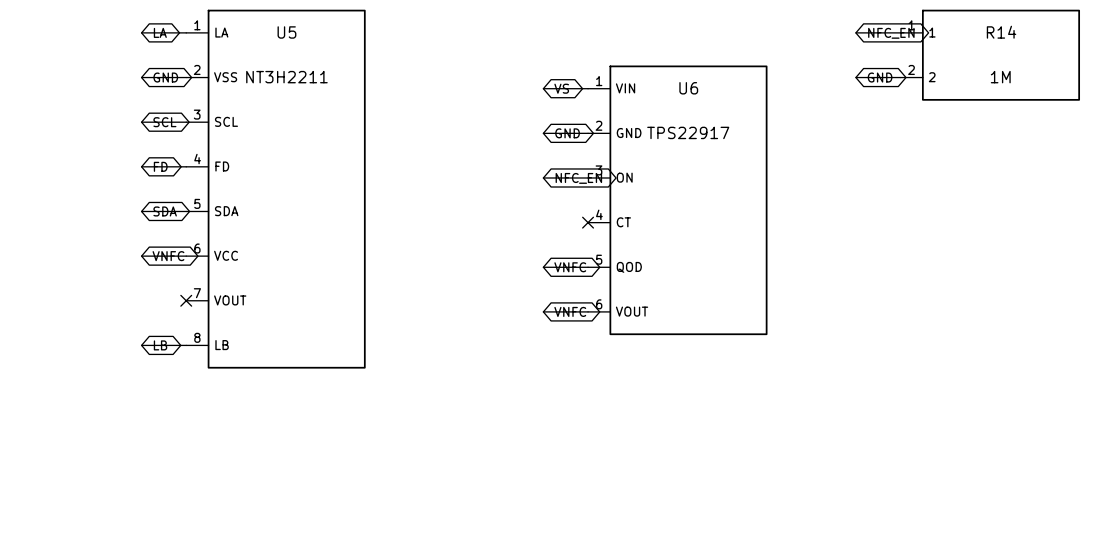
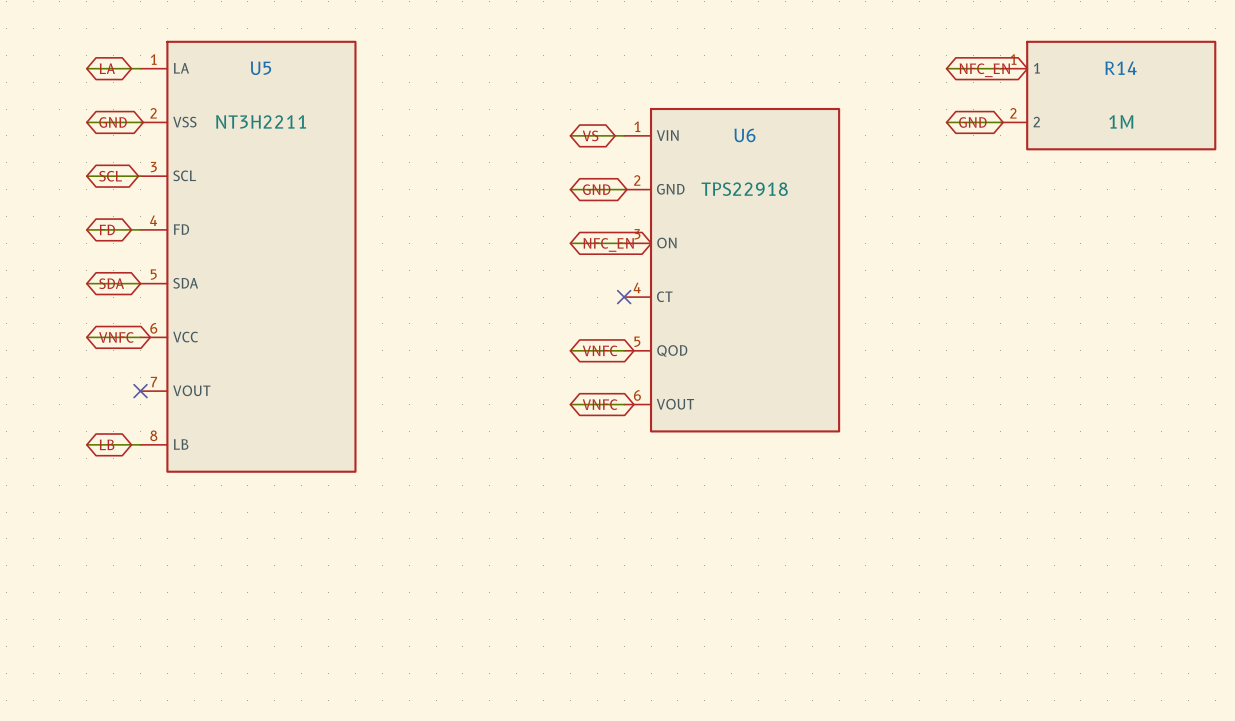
U6 value: TPS22917 (688, 132) -> TPS22918 (744, 189)

